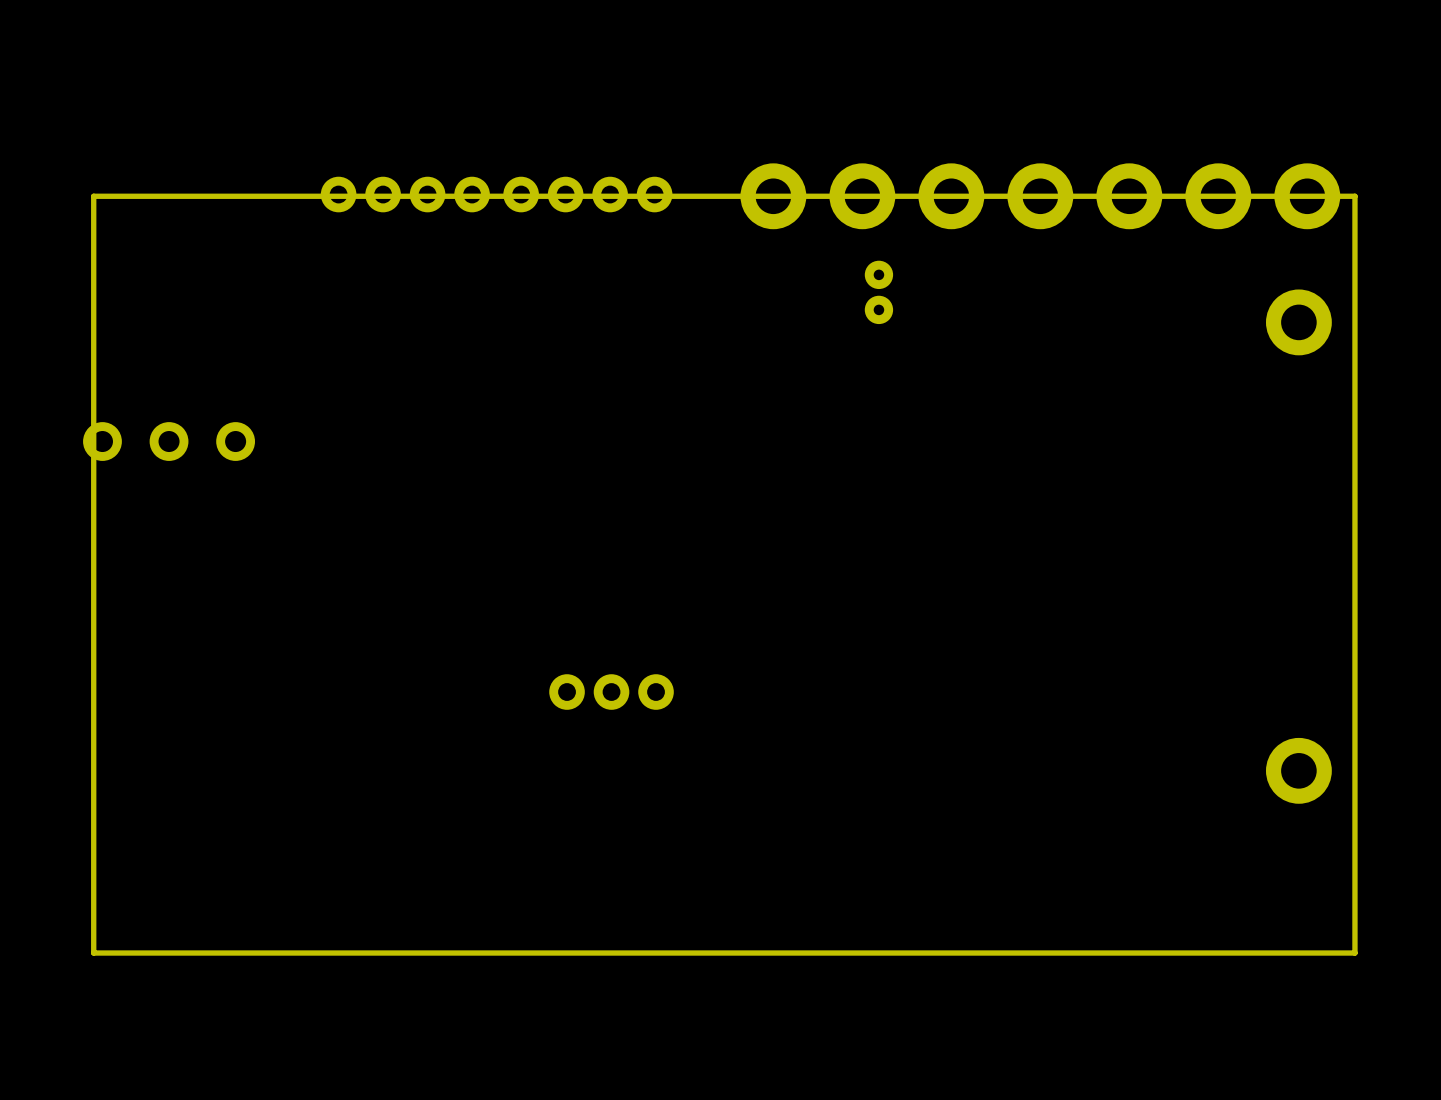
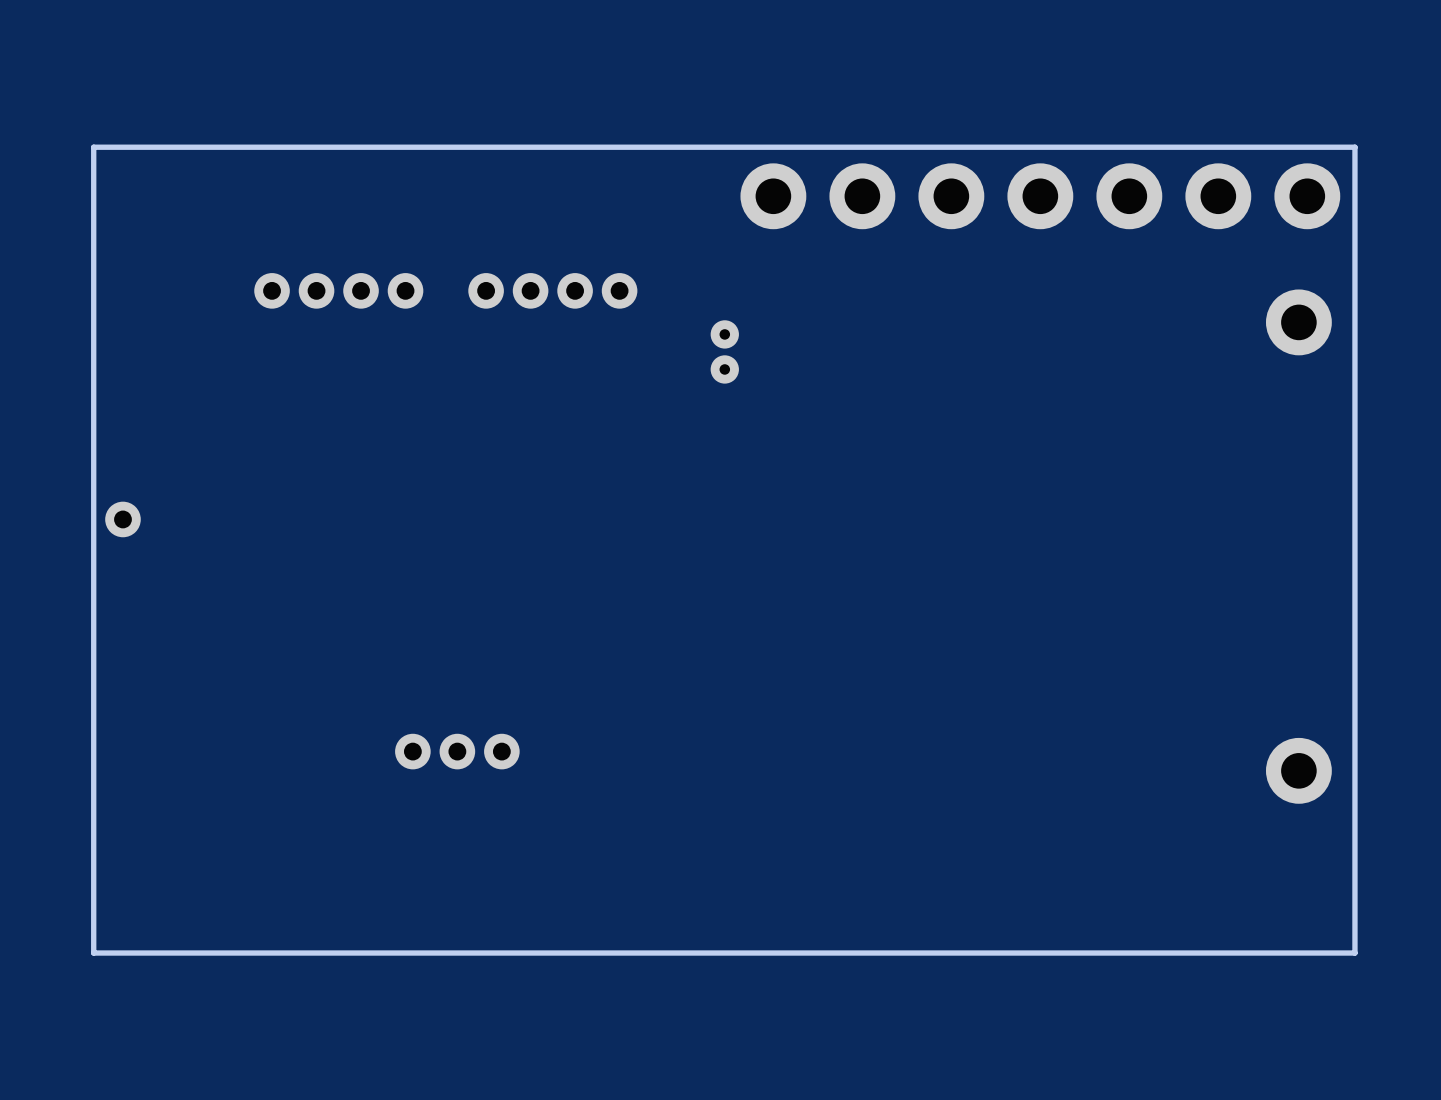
part: (405, 194) -> none
part: (587, 194) -> none
board edge: (1354, 196) (93, 196) -> (1354, 196) (1354, 147) (93, 147) (93, 196)
part: none -> (338, 290)
part: none -> (552, 290)
part position: (878, 292) -> (724, 351)
part: (169, 441) -> none
part: none -> (122, 519)
part position: (611, 692) -> (457, 751)

